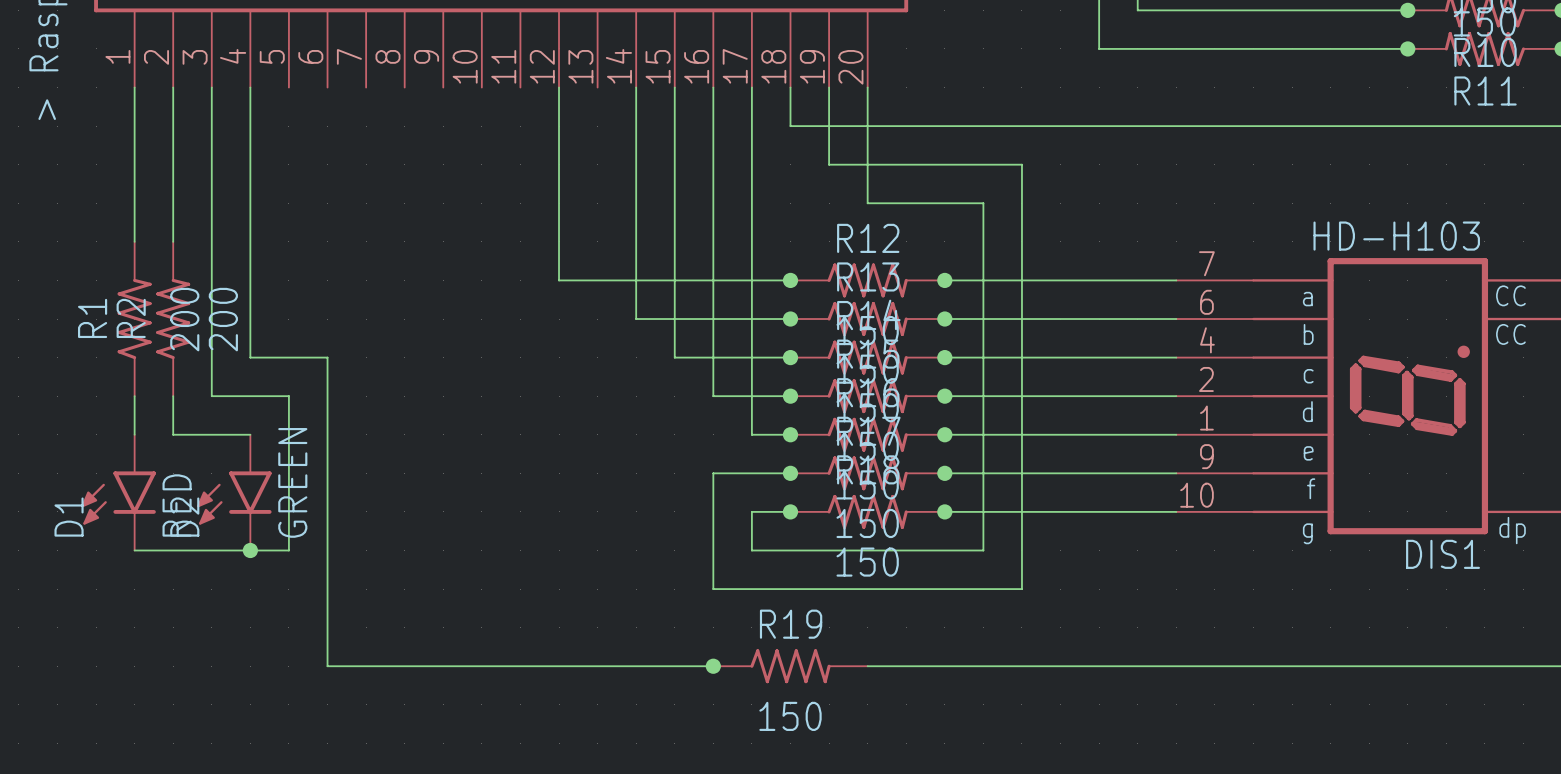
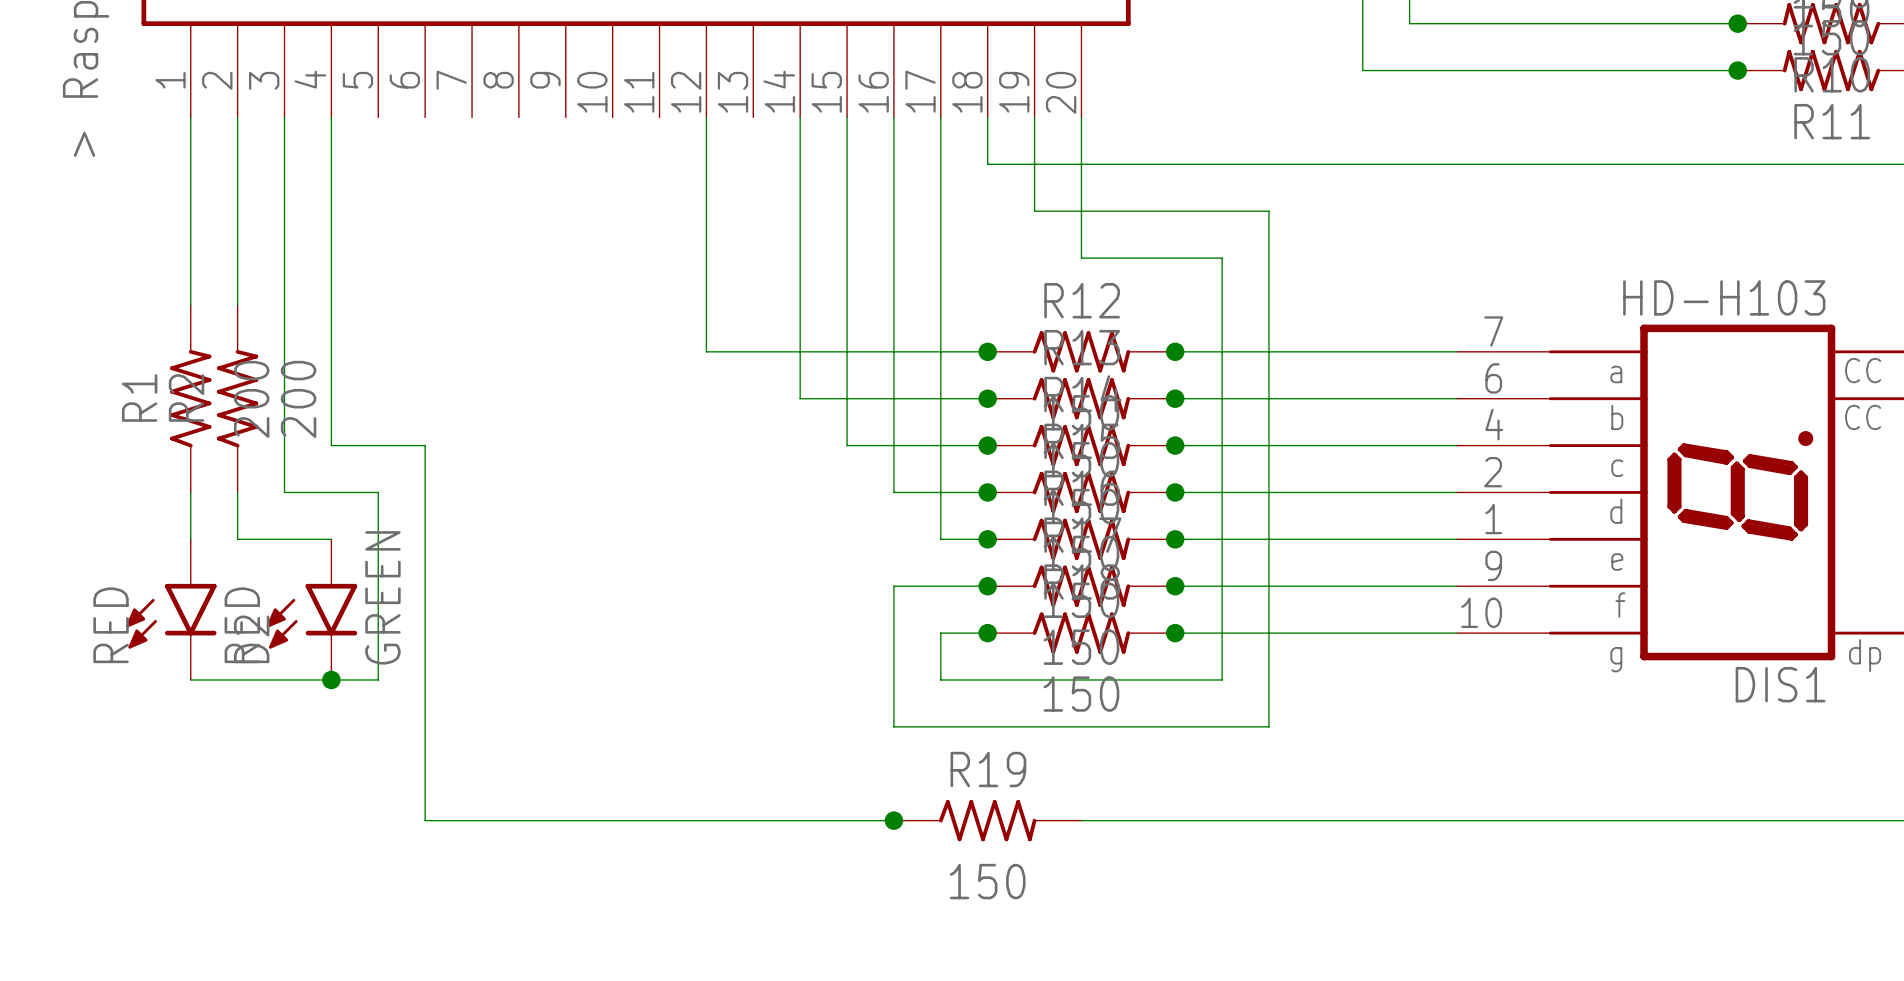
D1 name: D1 (69, 517) -> RED (111, 625)

